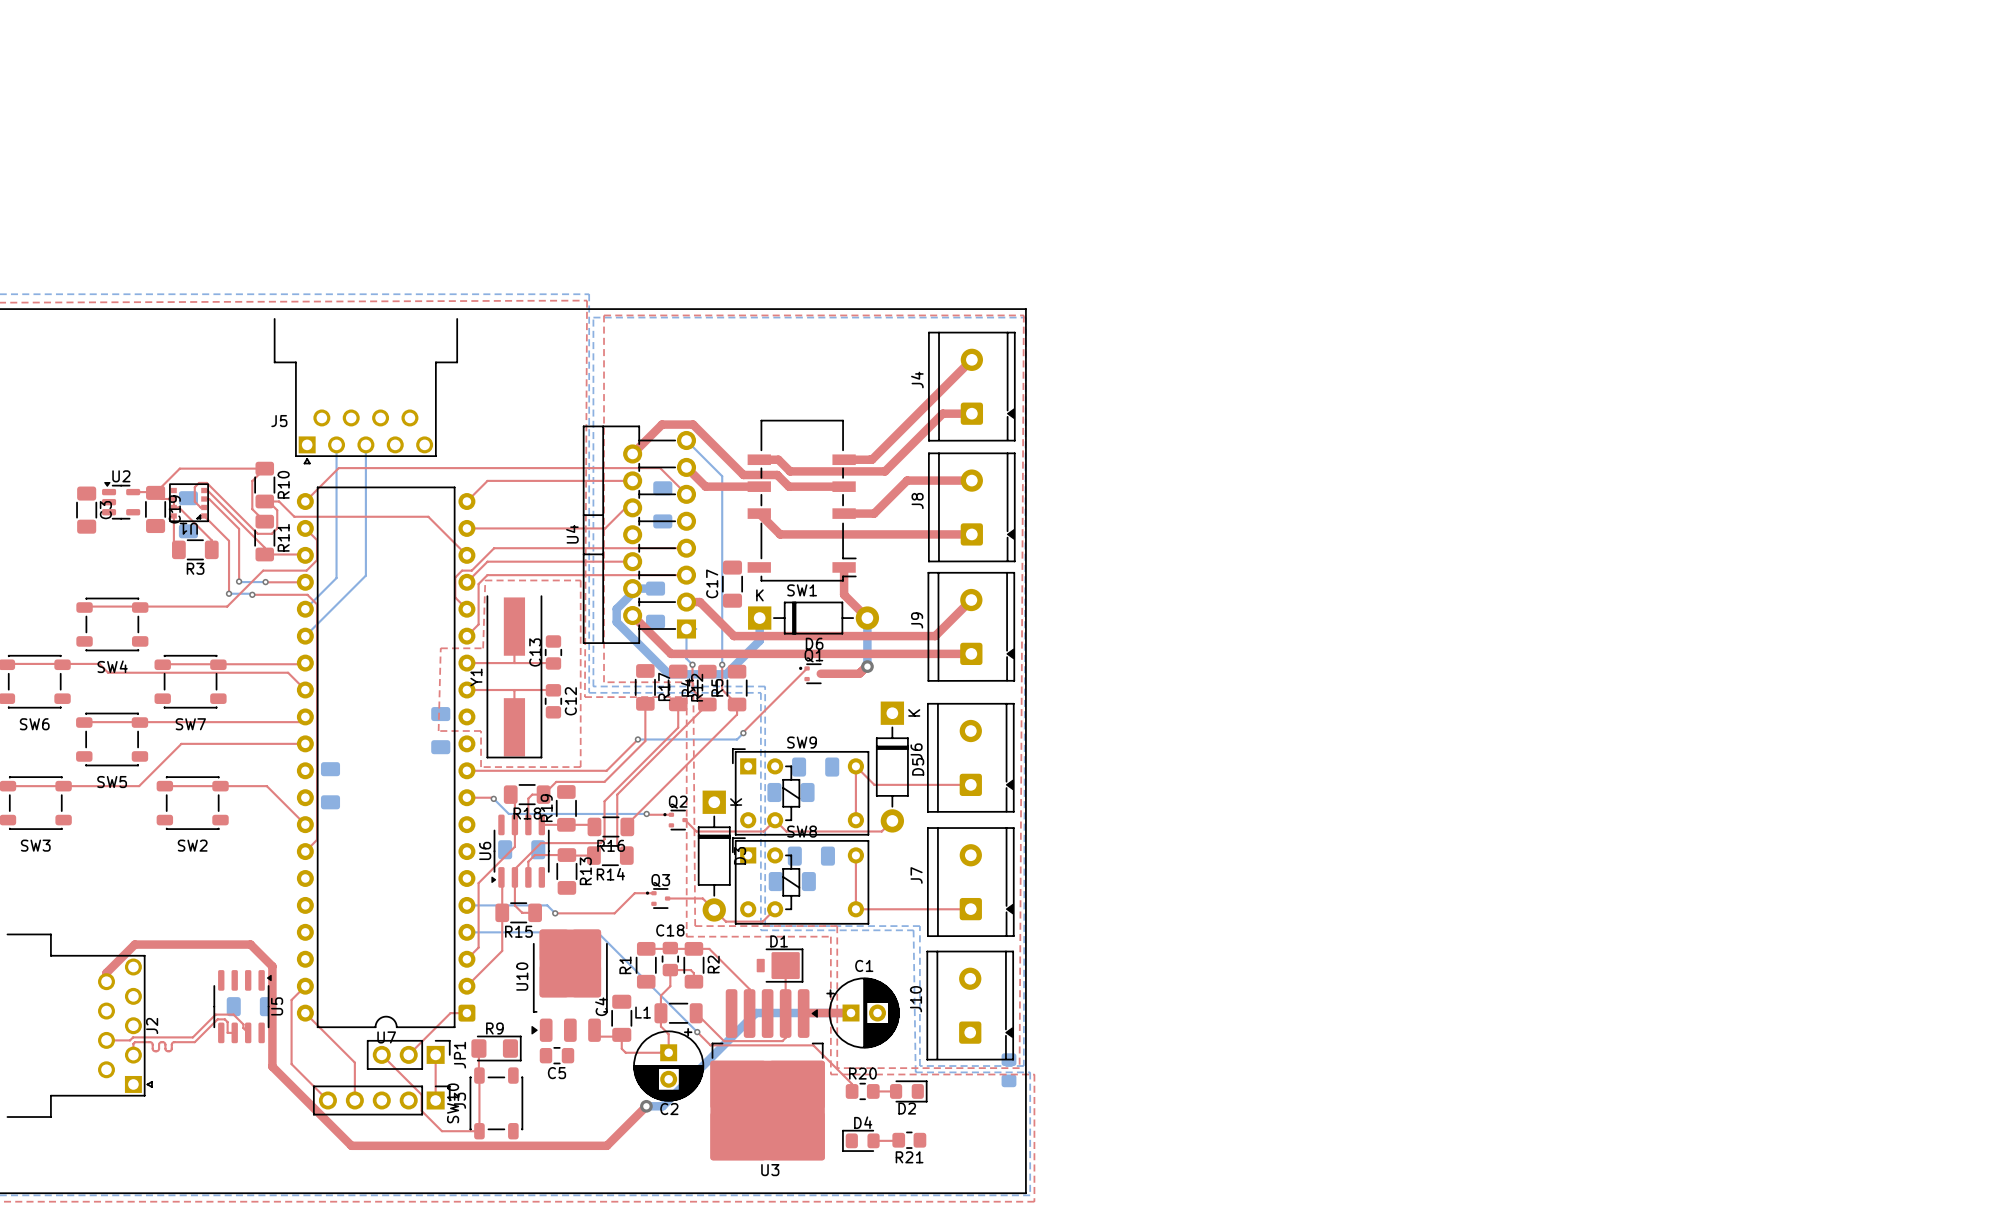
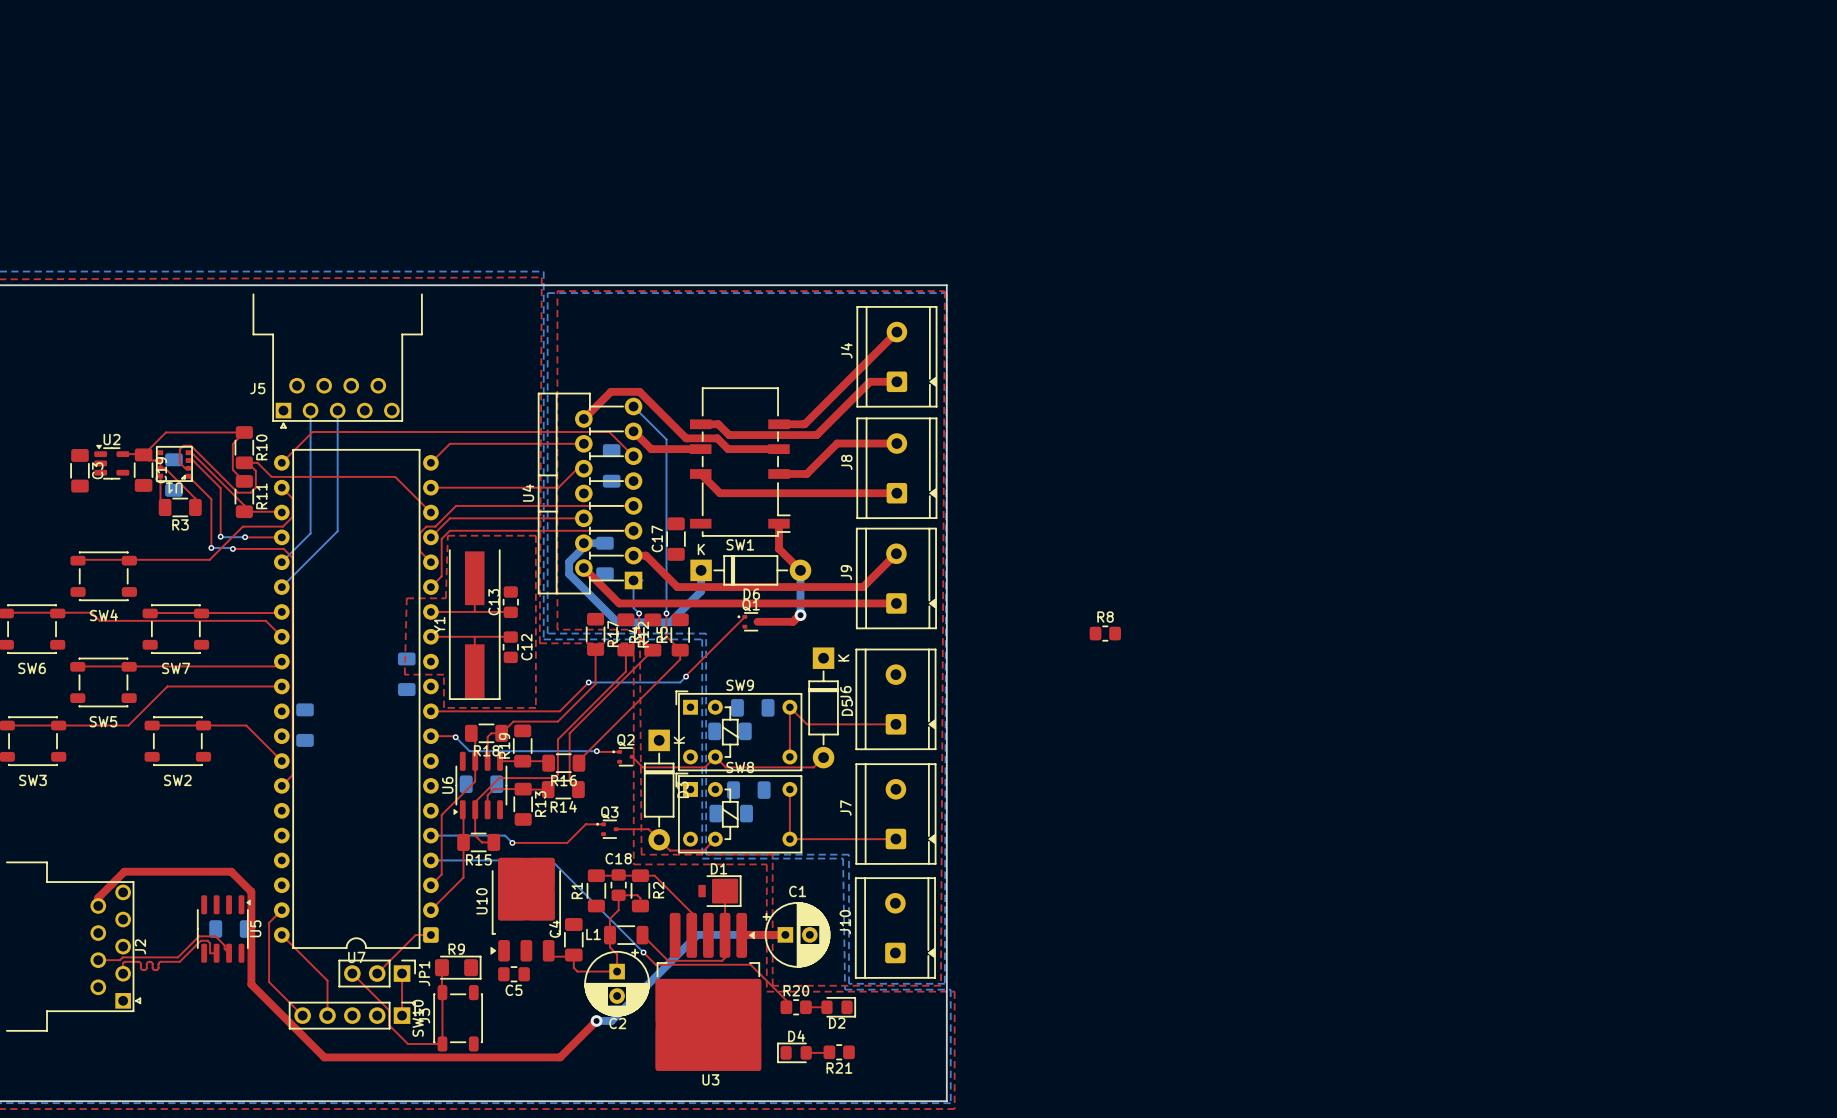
R8: none -> (1105, 633)
part: (1008, 1070) -> none

